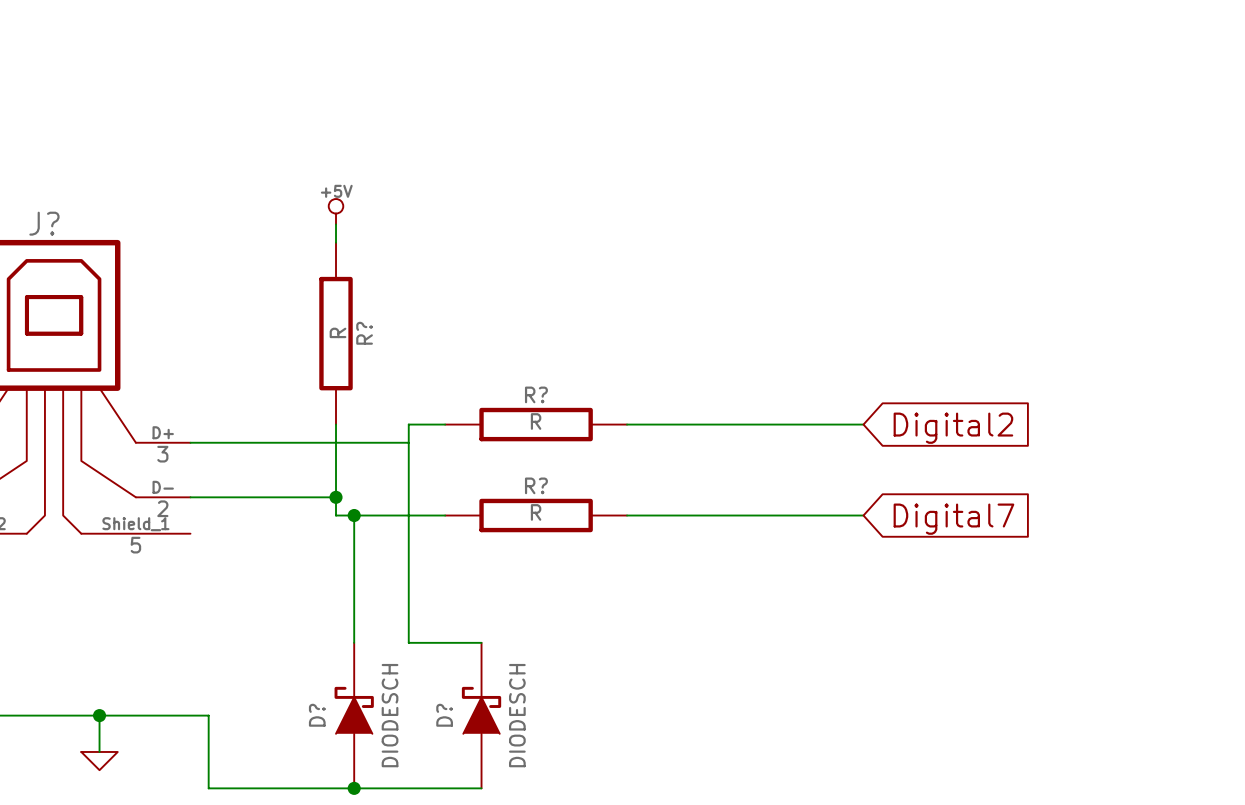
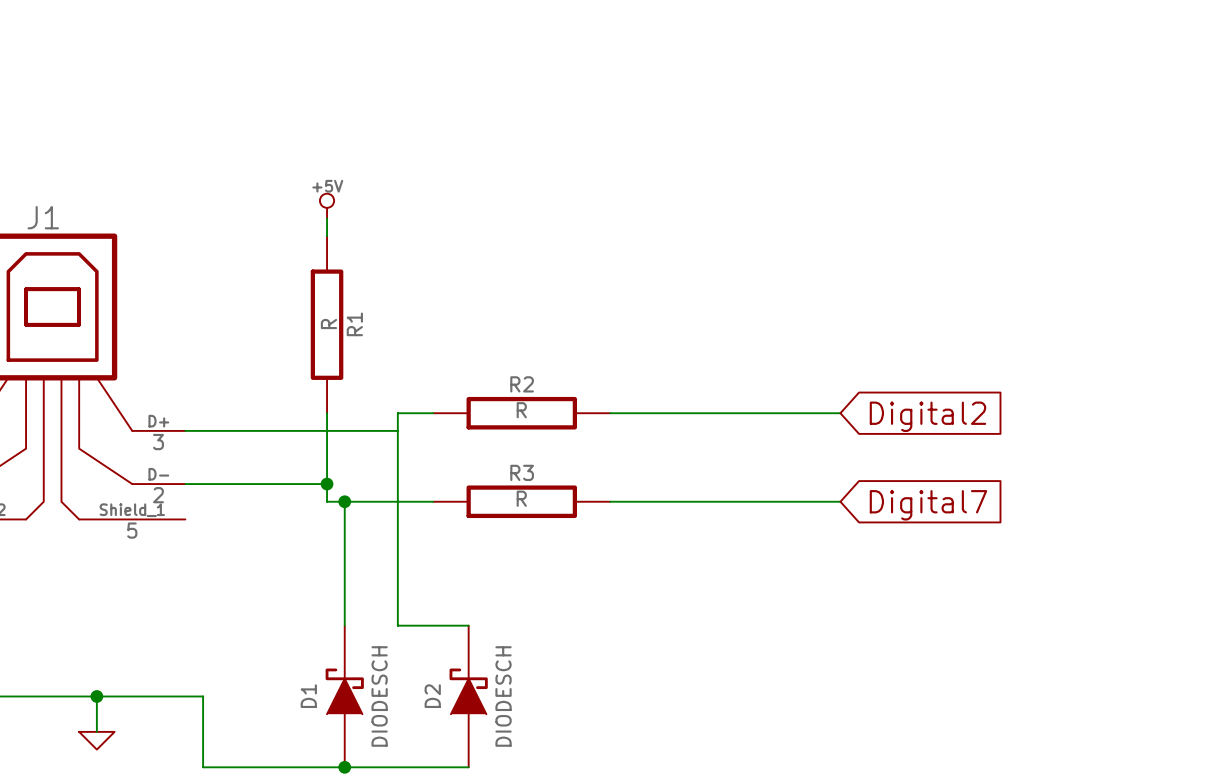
J? name: J? (44, 223) -> J1 (43, 217)
R? name: R? (364, 333) -> R1 (354, 324)
R? name: R? (536, 394) -> R2 (522, 384)
R? name: R? (536, 485) -> R3 (522, 472)
D? name: D? (317, 715) -> D1 (308, 696)
D? name: D? (444, 715) -> D2 (432, 696)

